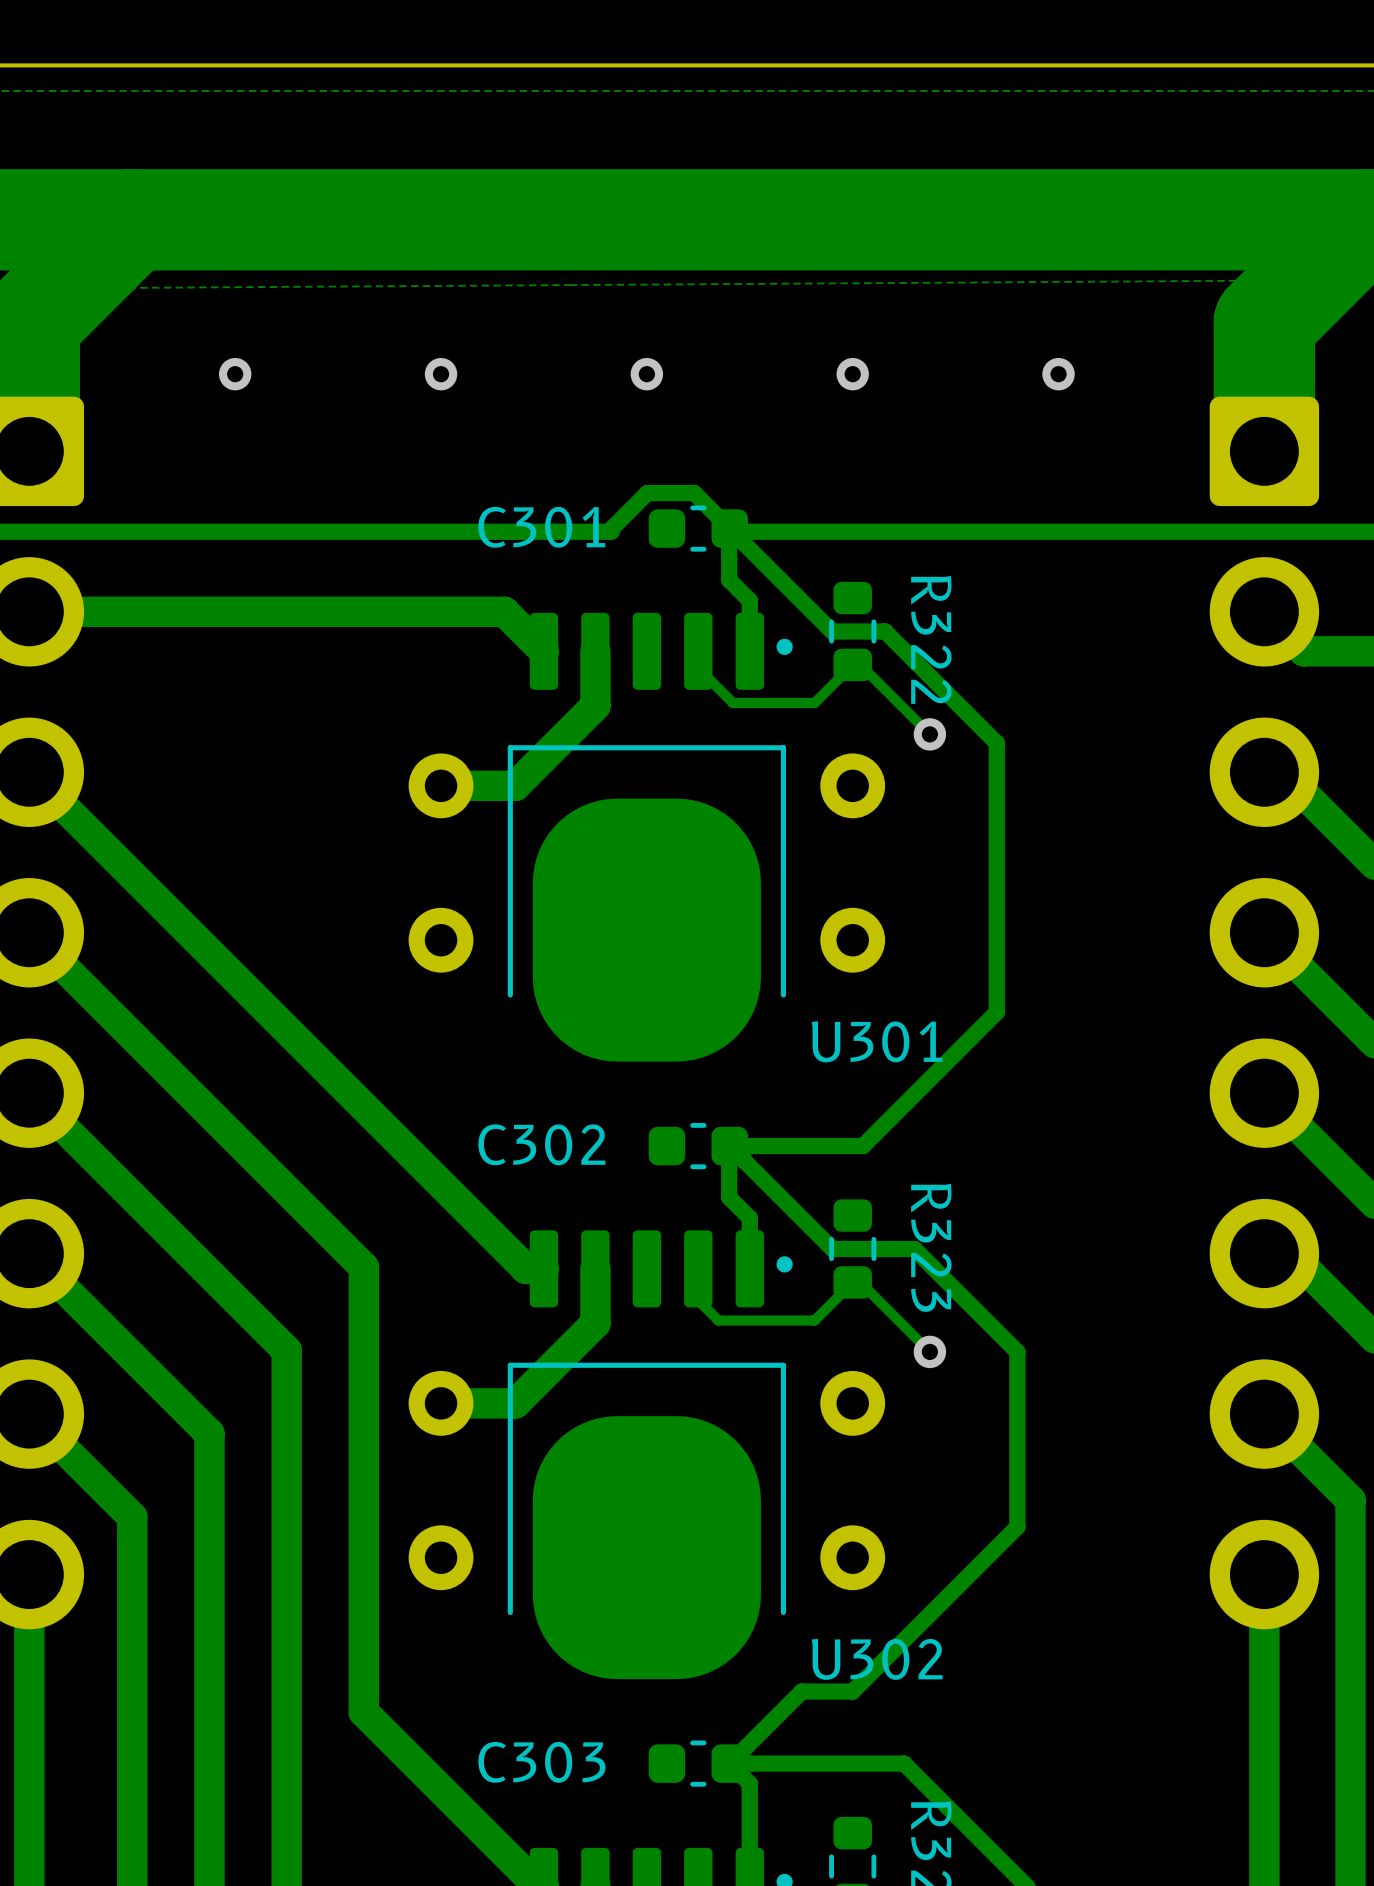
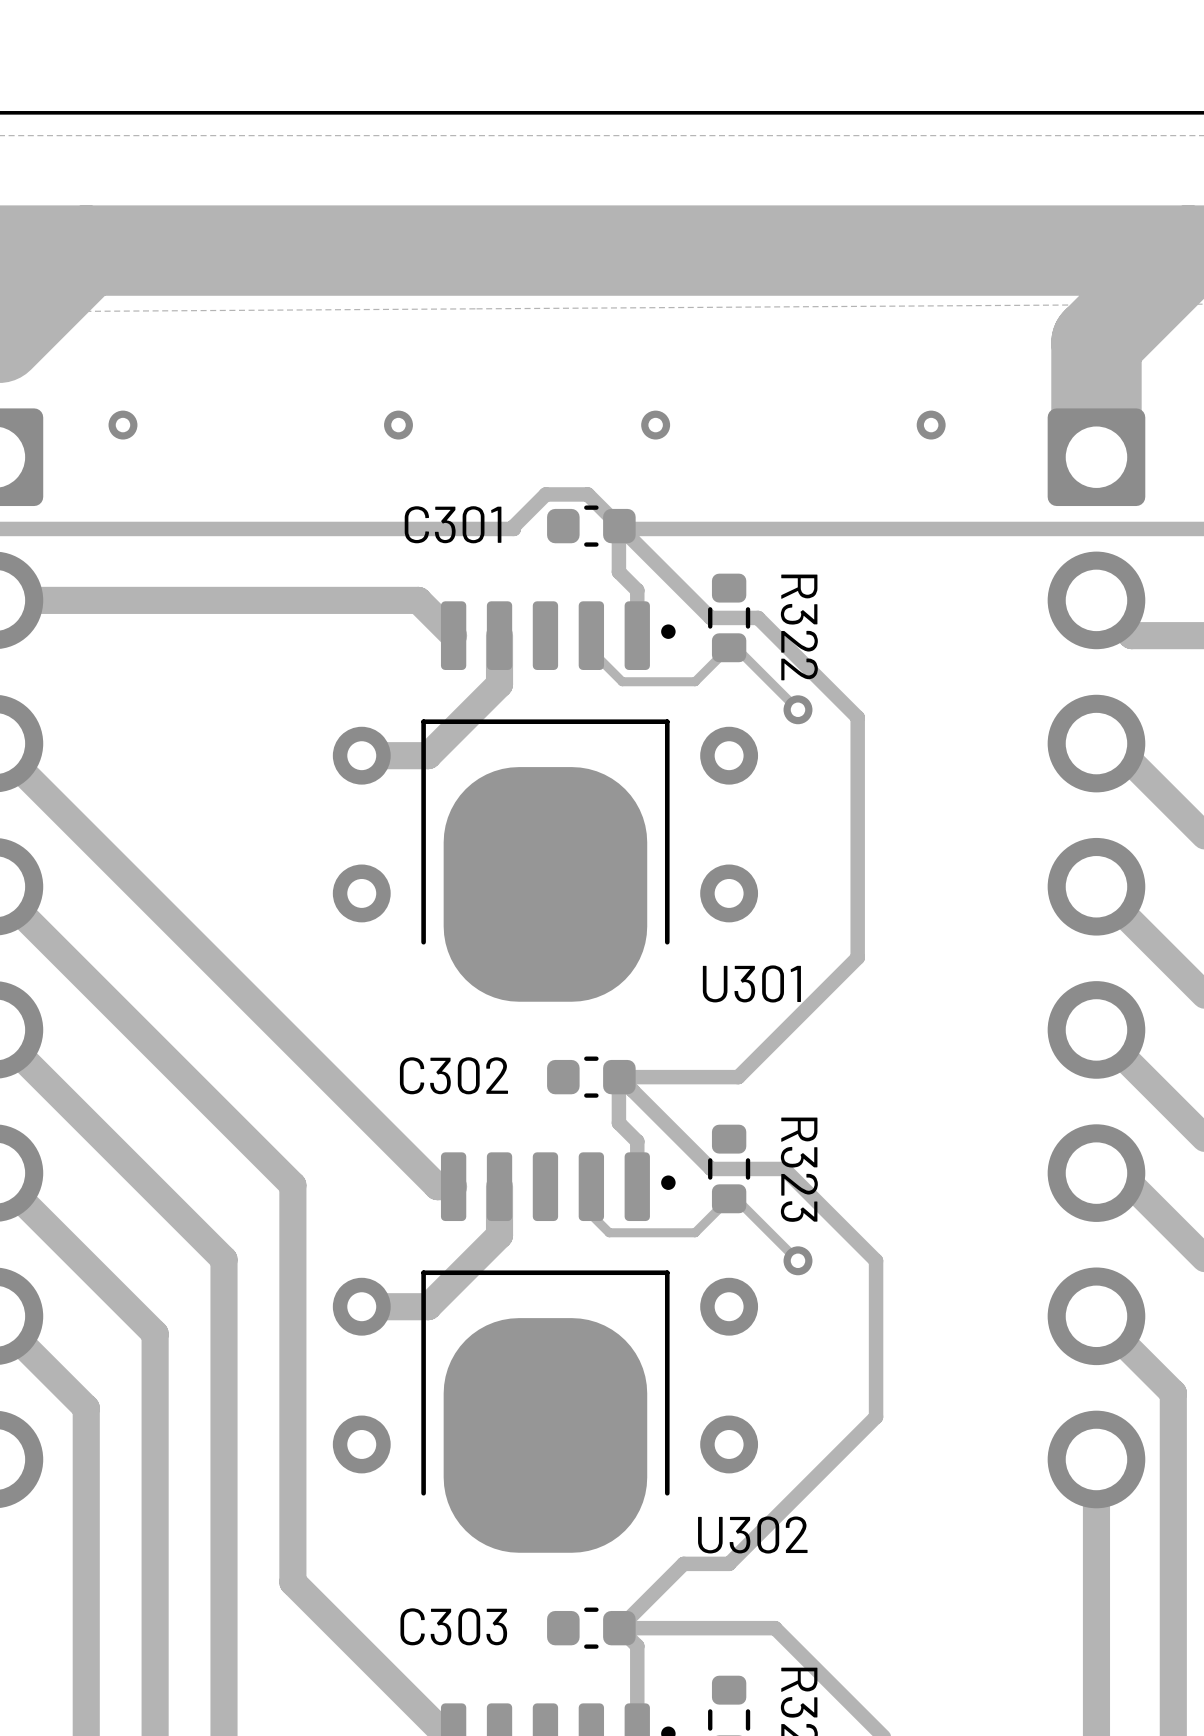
via position: (235, 374) -> (122, 425)
via position: (441, 374) -> (398, 425)
via: (646, 374) -> none
via: (852, 374) -> none
via position: (1058, 374) -> (931, 425)
via: none -> (655, 425)

